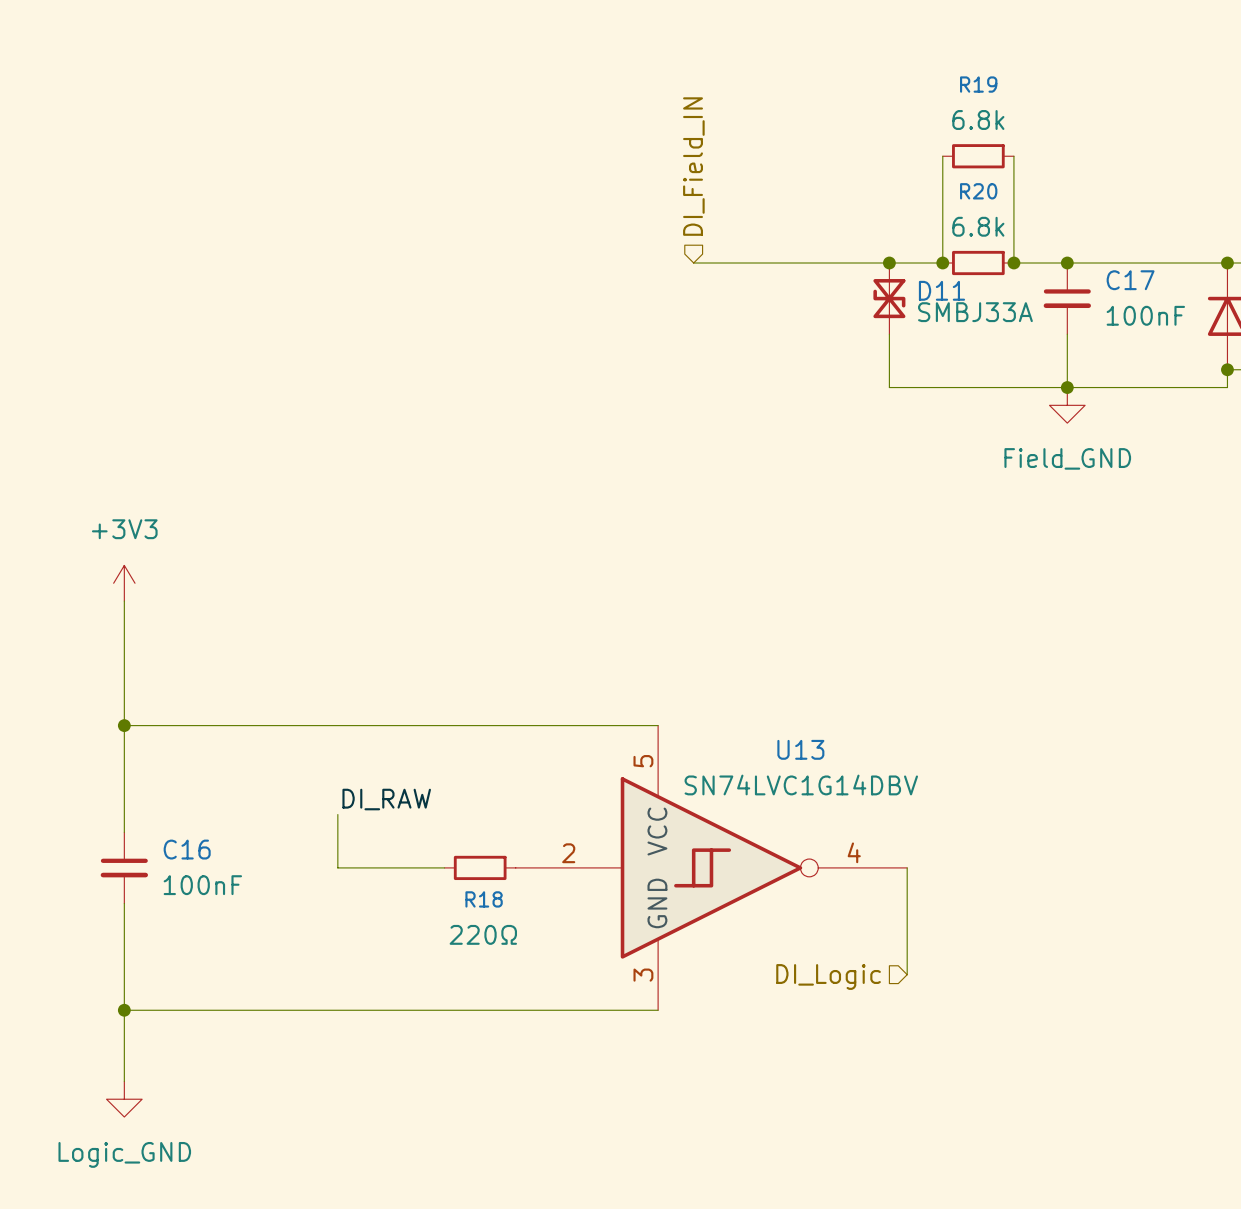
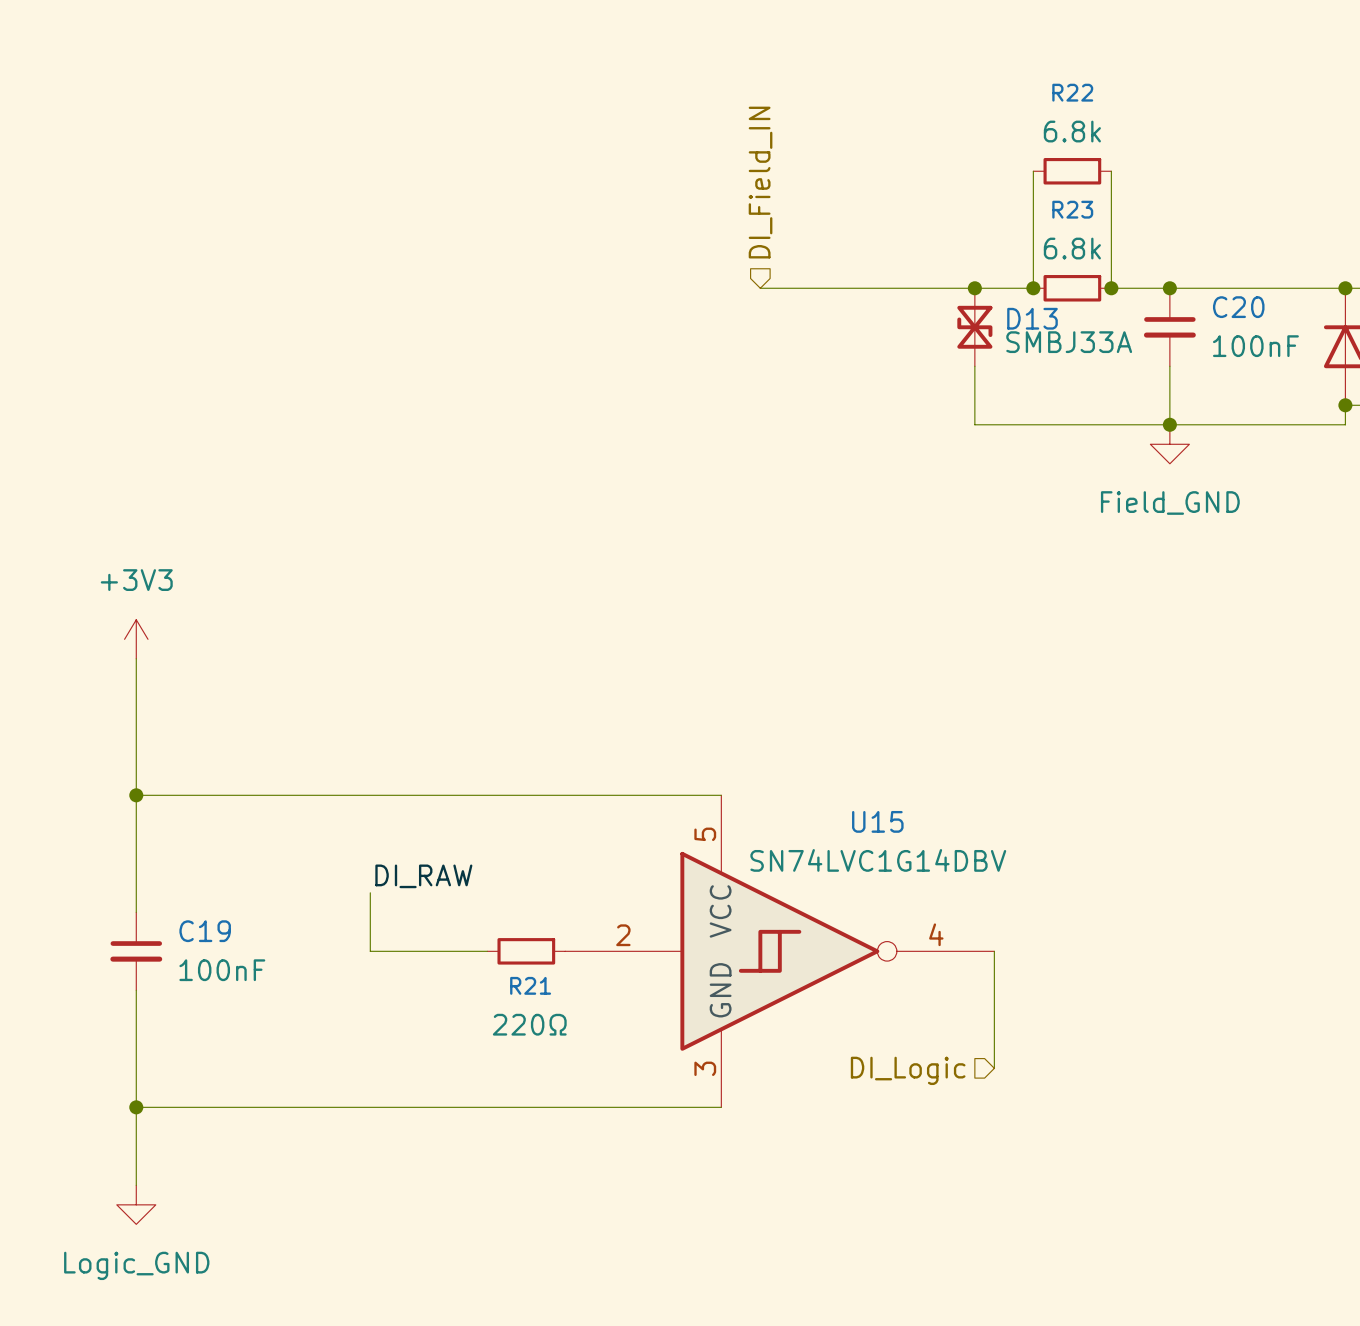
R19 name: R19 (978, 84) -> R22 (1072, 92)
R20 name: R20 (978, 191) -> R23 (1072, 209)
C17 name: C17 (1130, 280) -> C20 (1238, 307)
D11 name: D11 (941, 290) -> D13 (1032, 318)
U13 name: U13 (800, 749) -> U15 (877, 821)
C16 name: C16 (187, 849) -> C19 (205, 931)
R18 name: R18 (484, 899) -> R21 (530, 985)

